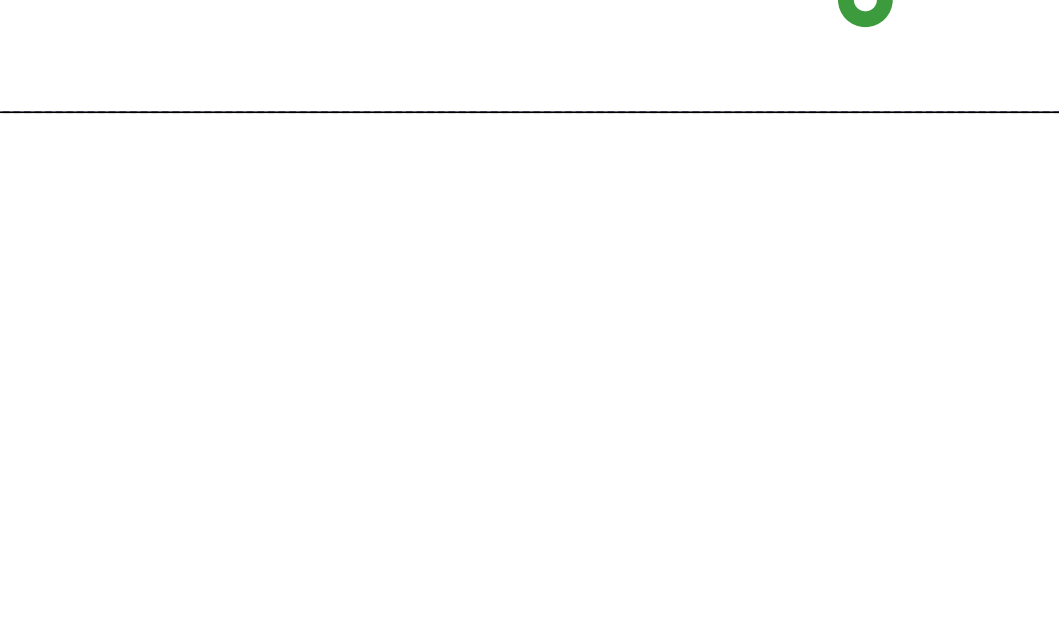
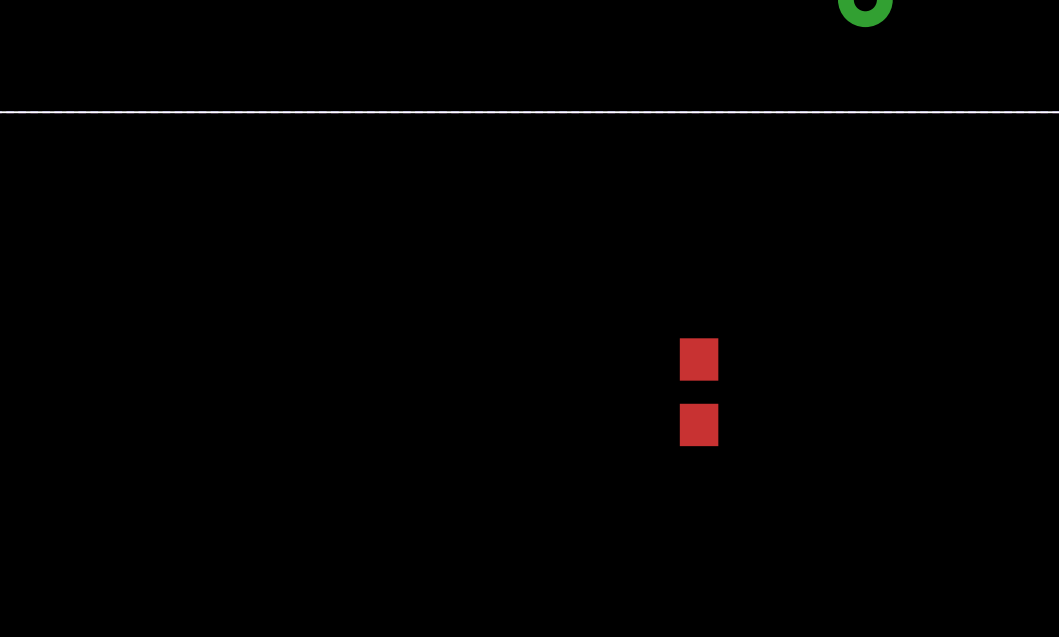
part: none -> (699, 392)

